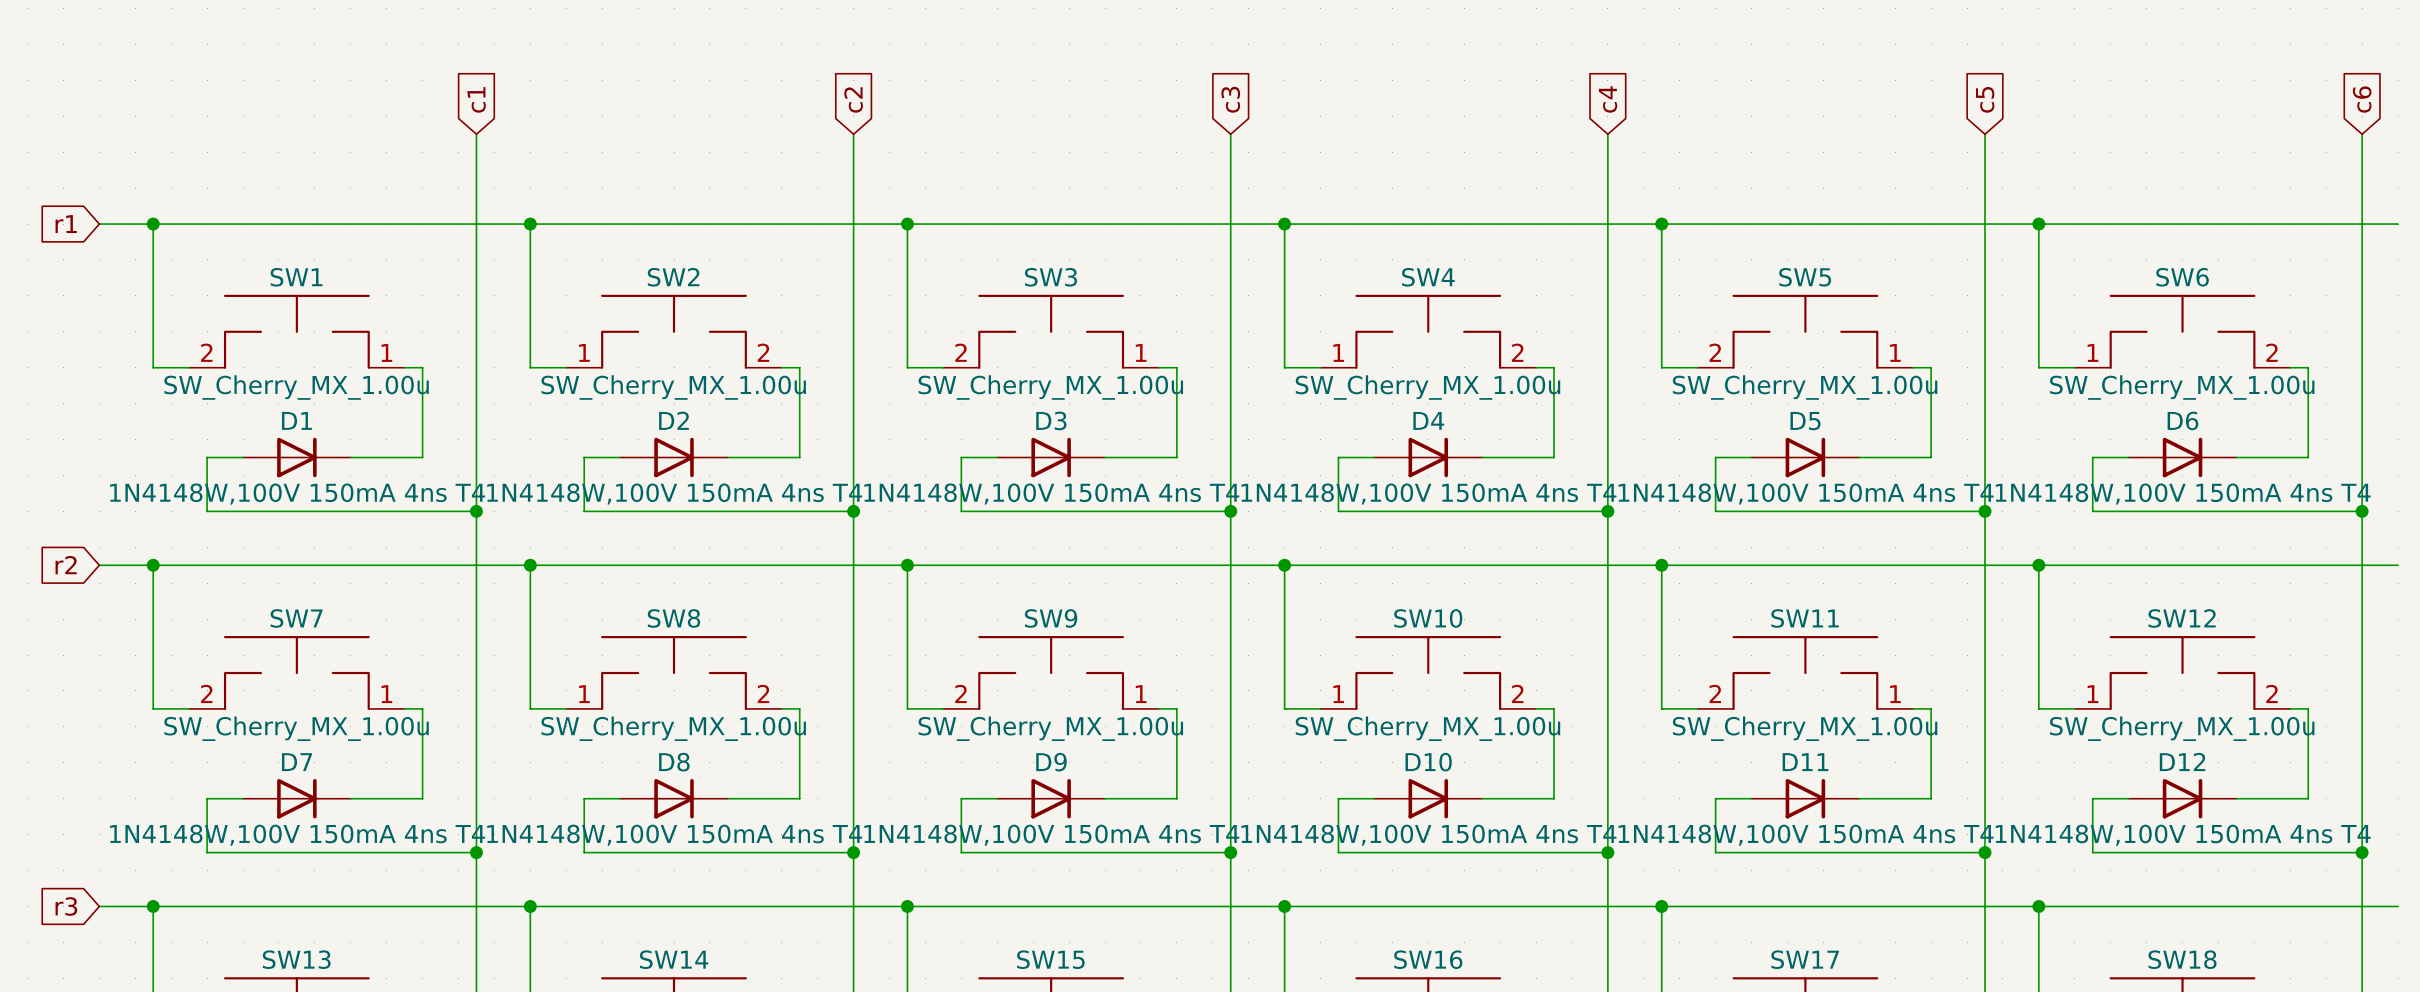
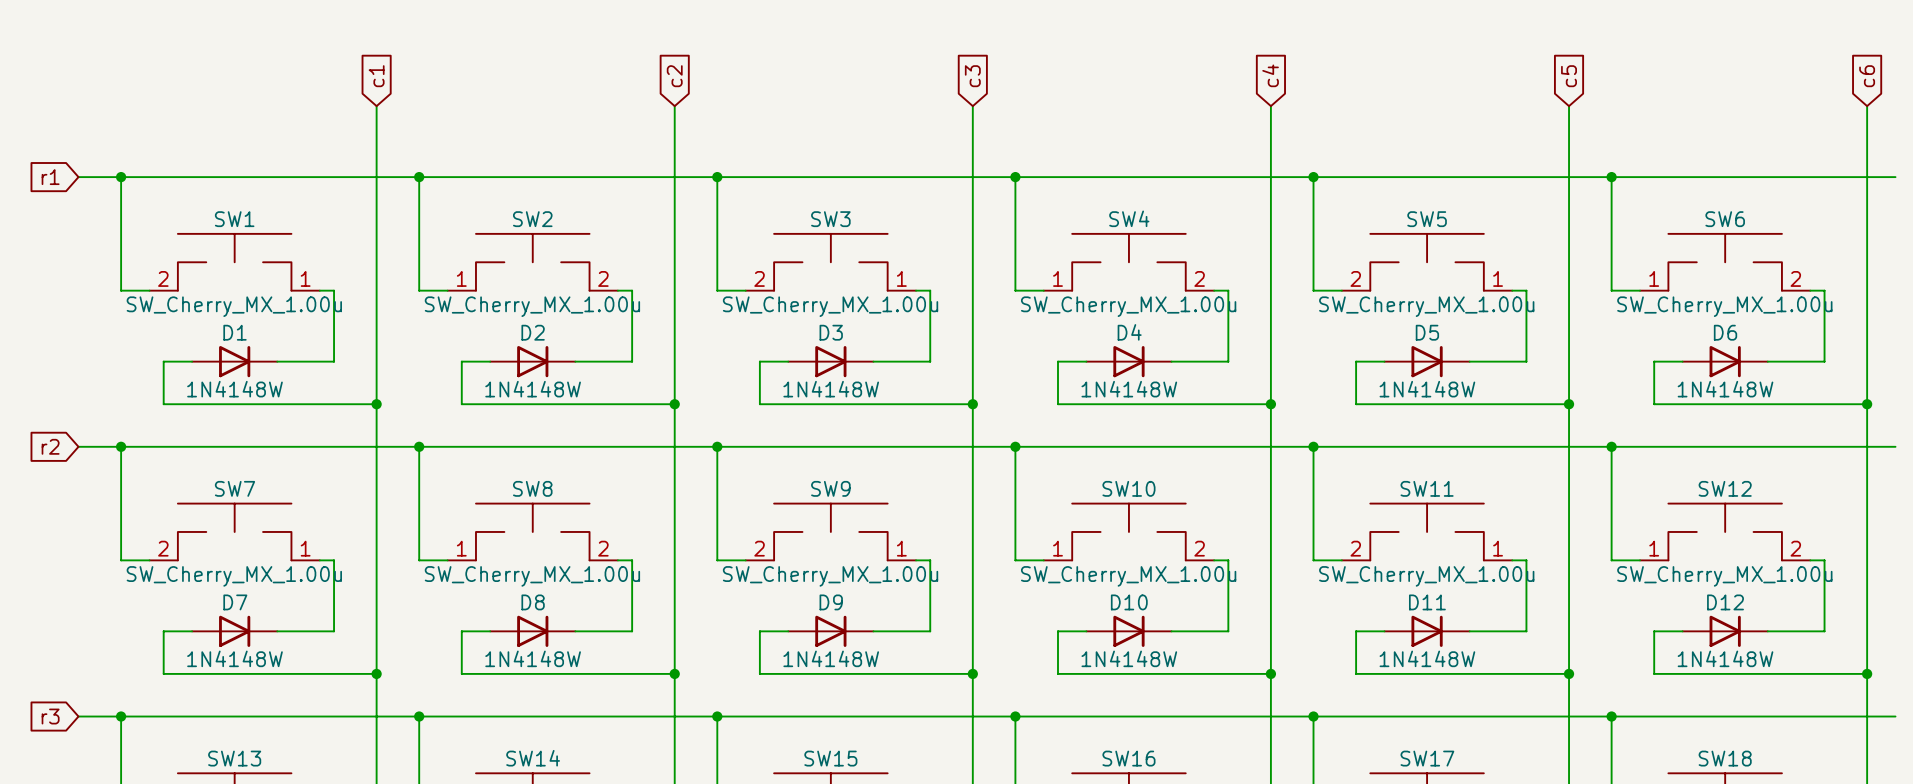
D1 value: 1N4148W,100V 150mA 4ns T4 (297, 494) -> 1N4148W (235, 389)
D2 value: 1N4148W,100V 150mA 4ns T4 (674, 494) -> 1N4148W (533, 389)
D3 value: 1N4148W,100V 150mA 4ns T4 (1051, 494) -> 1N4148W (831, 389)
D4 value: 1N4148W,100V 150mA 4ns T4 (1428, 494) -> 1N4148W (1129, 389)
D5 value: 1N4148W,100V 150mA 4ns T4 (1806, 494) -> 1N4148W (1427, 389)
D6 value: 1N4148W,100V 150mA 4ns T4 (2183, 494) -> 1N4148W (1725, 389)
D7 value: 1N4148W,100V 150mA 4ns T4 (297, 835) -> 1N4148W (235, 658)
D8 value: 1N4148W,100V 150mA 4ns T4 (674, 835) -> 1N4148W (533, 658)
D9 value: 1N4148W,100V 150mA 4ns T4 (1051, 835) -> 1N4148W (831, 658)
D10 value: 1N4148W,100V 150mA 4ns T4 (1428, 835) -> 1N4148W (1129, 658)
D11 value: 1N4148W,100V 150mA 4ns T4 (1806, 835) -> 1N4148W (1427, 658)
D12 value: 1N4148W,100V 150mA 4ns T4 (2183, 835) -> 1N4148W (1725, 658)

